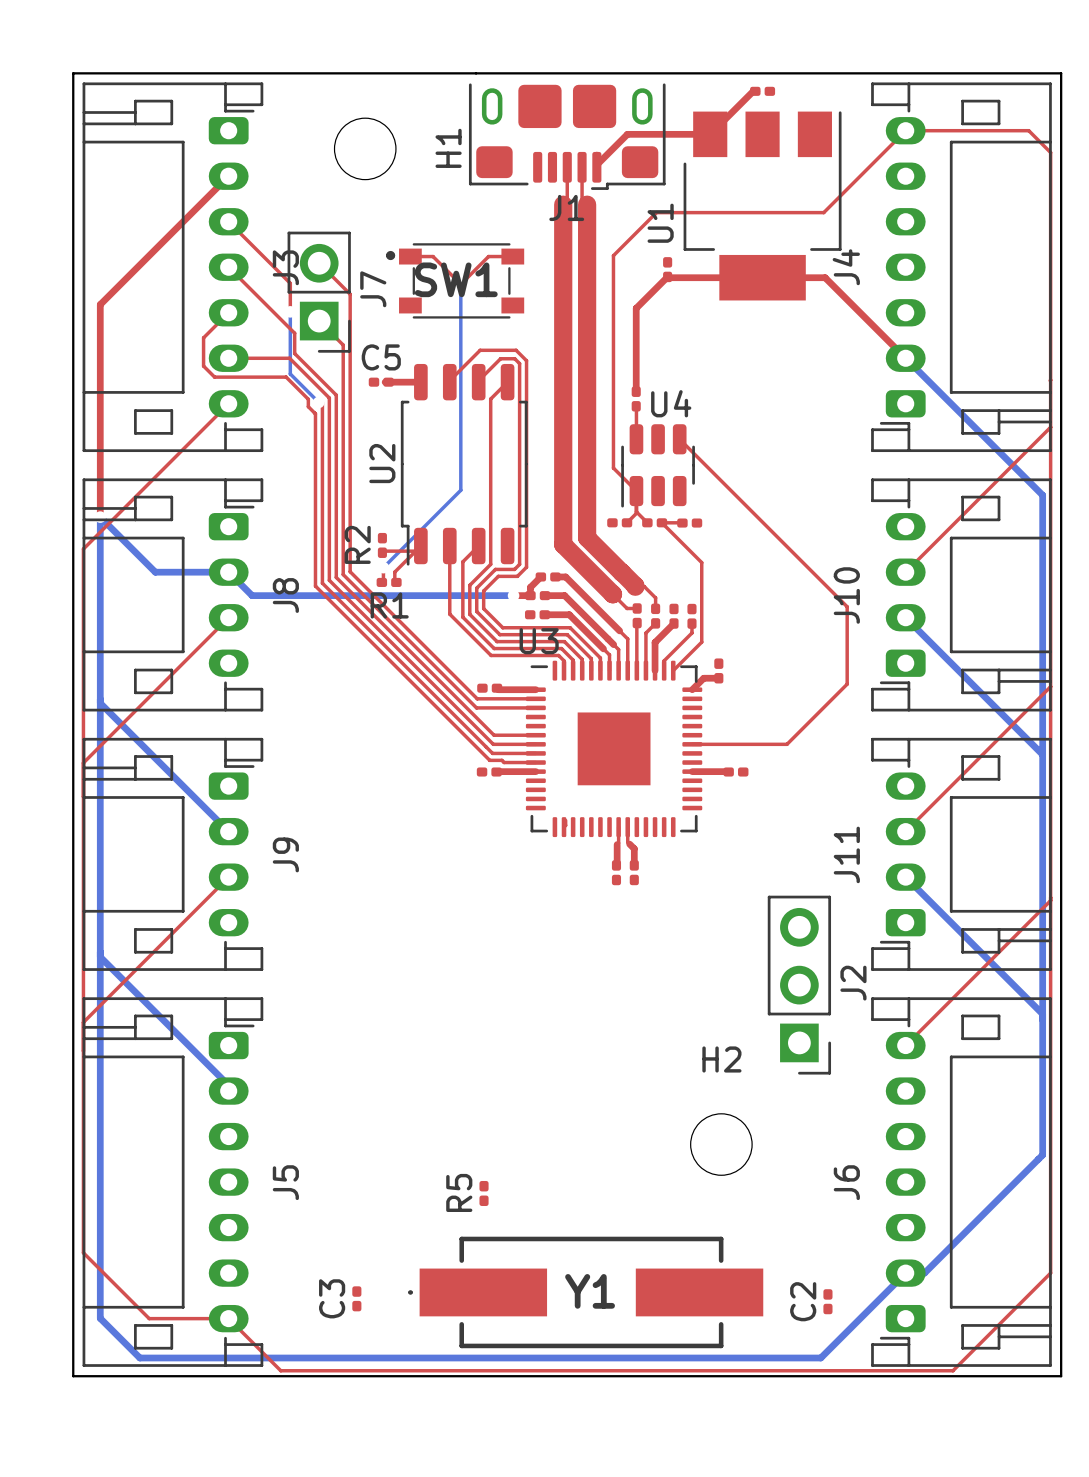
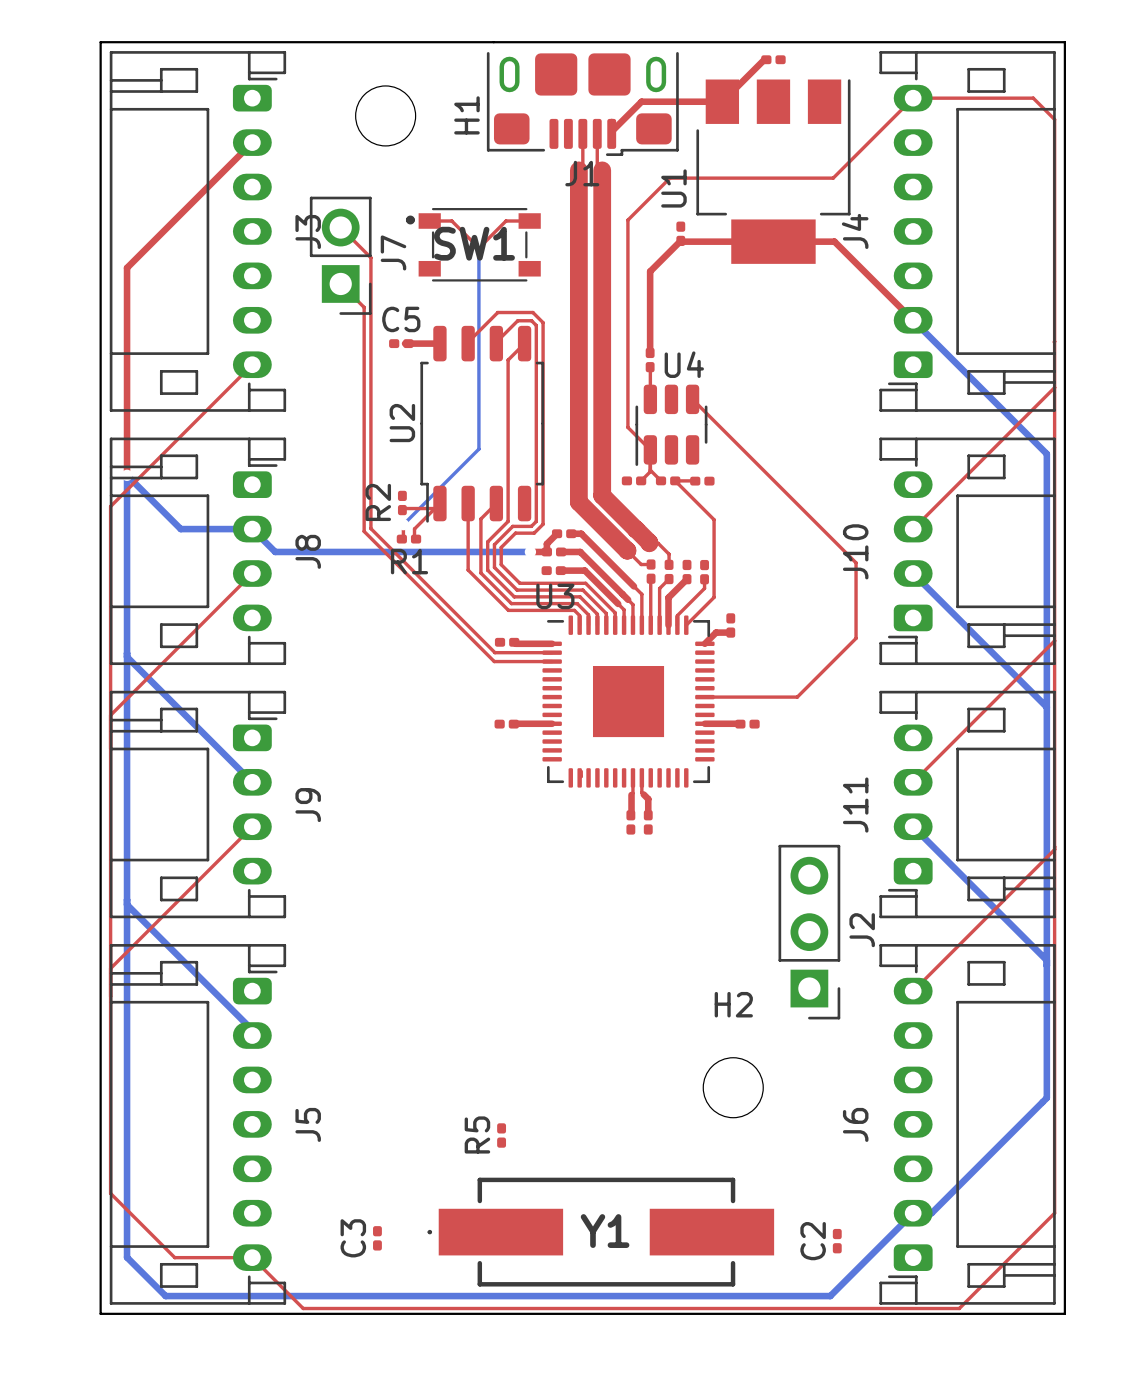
top track: (228, 221) (290, 283) (290, 311) -> none
top track: (228, 267) (294, 333) (294, 353) (336, 395) (336, 577) (494, 735) (535, 735) -> none
bottom track: (290, 311) (290, 373) (318, 402) -> none
top track: (228, 312) (203, 337) (203, 366) (214, 377) (286, 377) (308, 399) (308, 406) (315, 413) (315, 586) (489, 760) (535, 762) -> none
top track: (228, 358) (289, 358) (329, 398) (329, 580) (493, 744) (535, 744) -> none
top track: (322, 402) (322, 583) (492, 753) (535, 753) -> none

